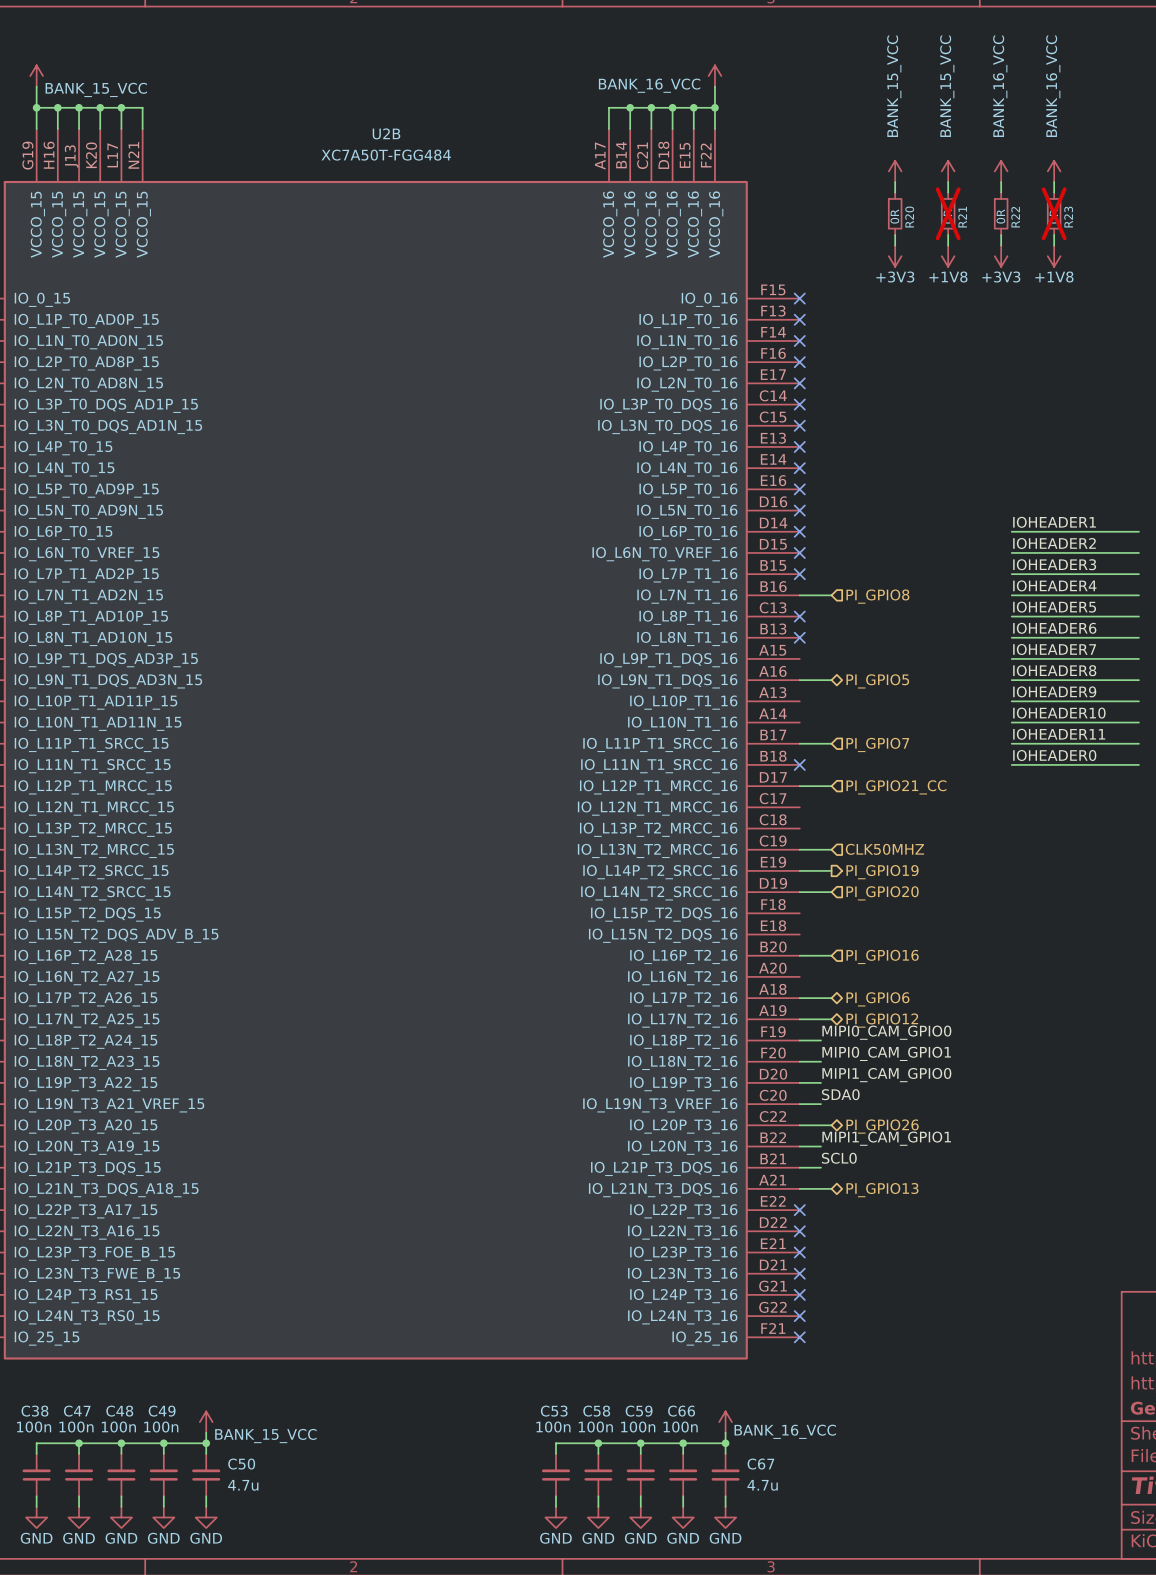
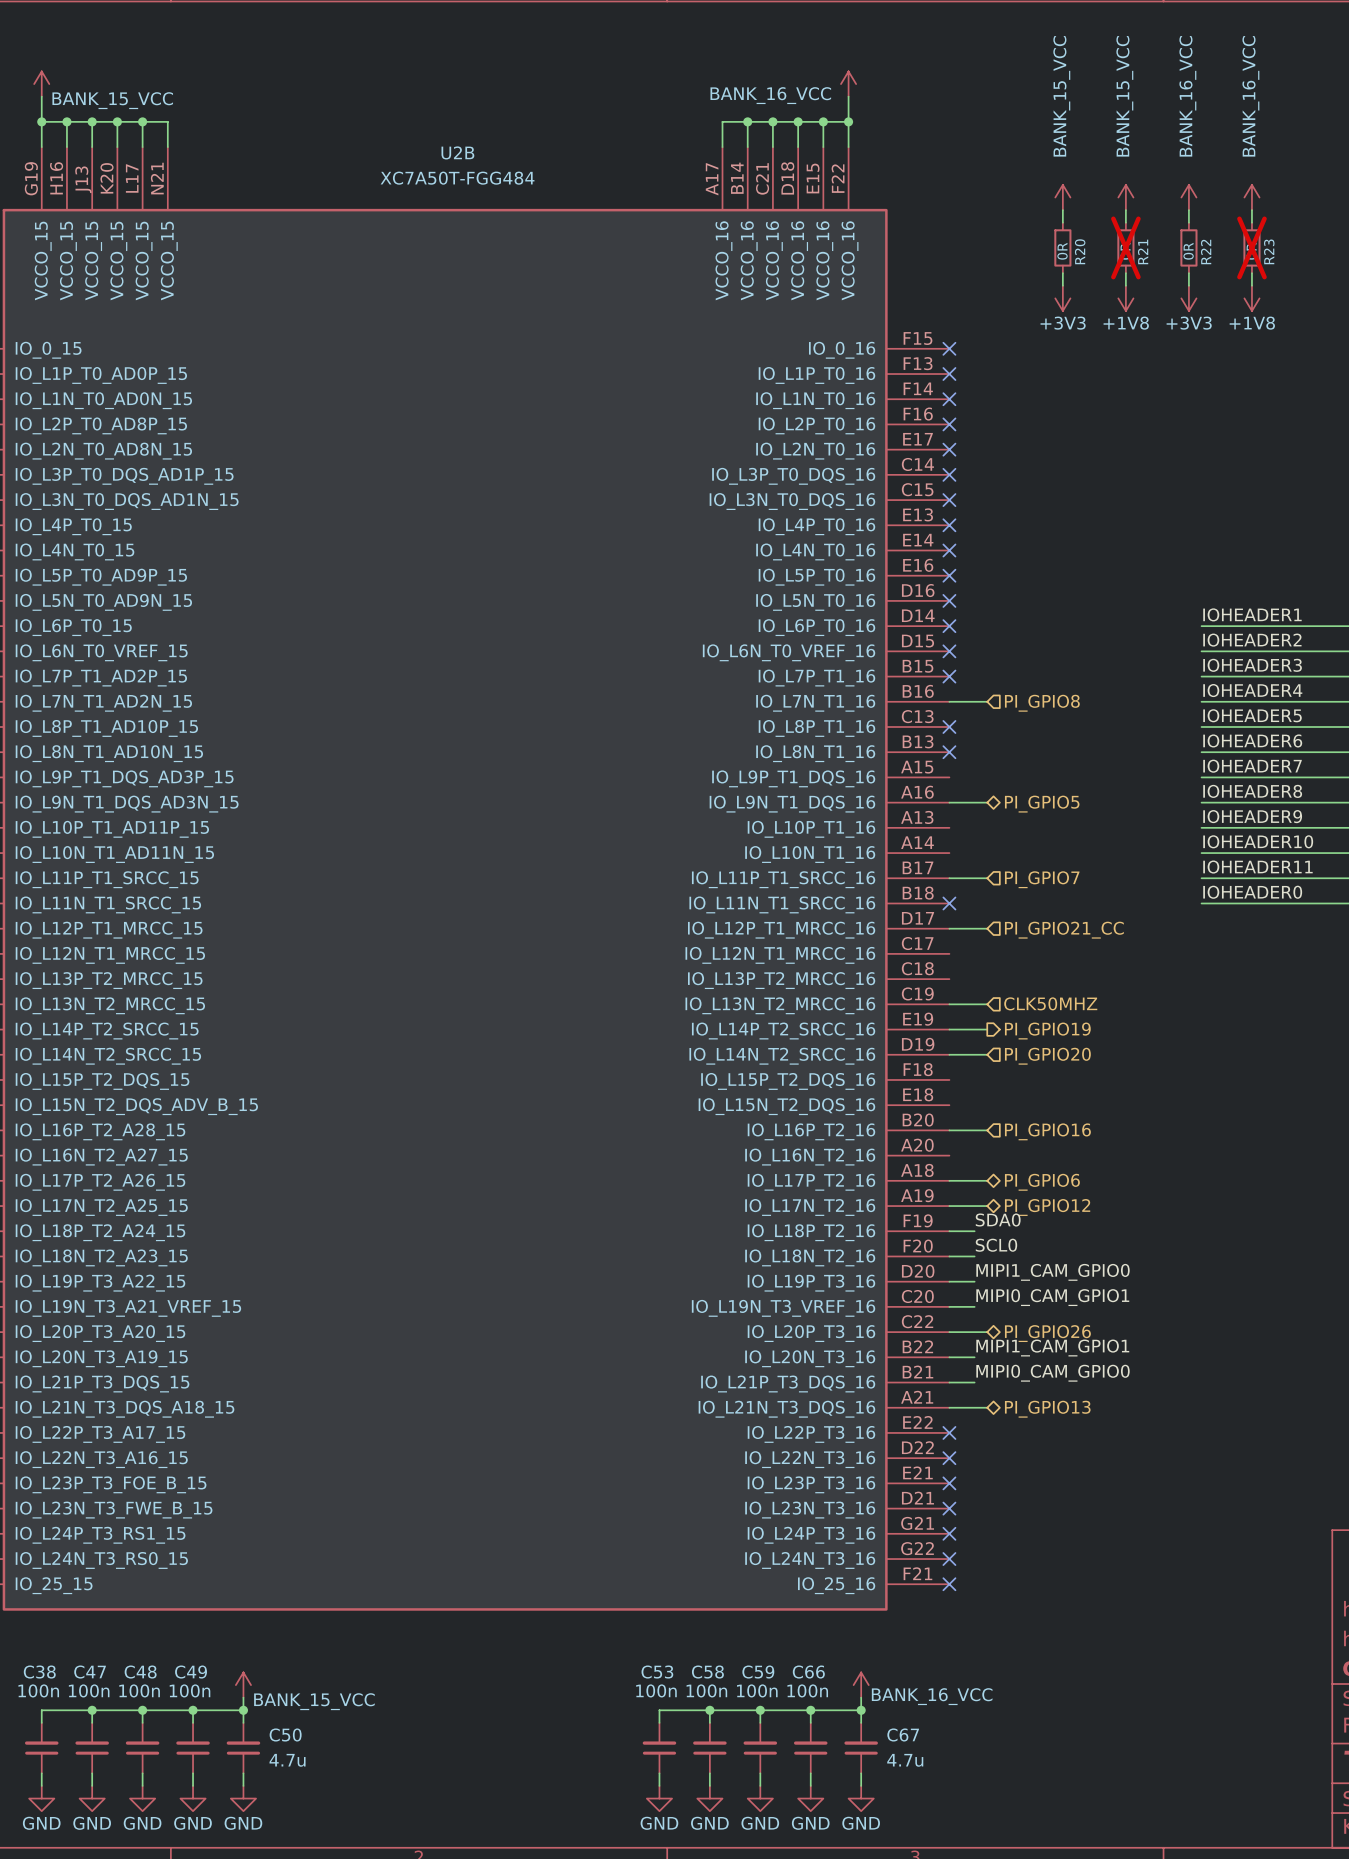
label: MIPI0_CAM_GPIO0 (886, 1032) -> SDA0 (998, 1220)
label: MIPI0_CAM_GPIO1 (886, 1053) -> SCL0 (996, 1245)
label: SDA0 (840, 1094) -> MIPI0_CAM_GPIO1 (1052, 1297)
label: SCL0 (839, 1158) -> MIPI0_CAM_GPIO0 (1053, 1373)

